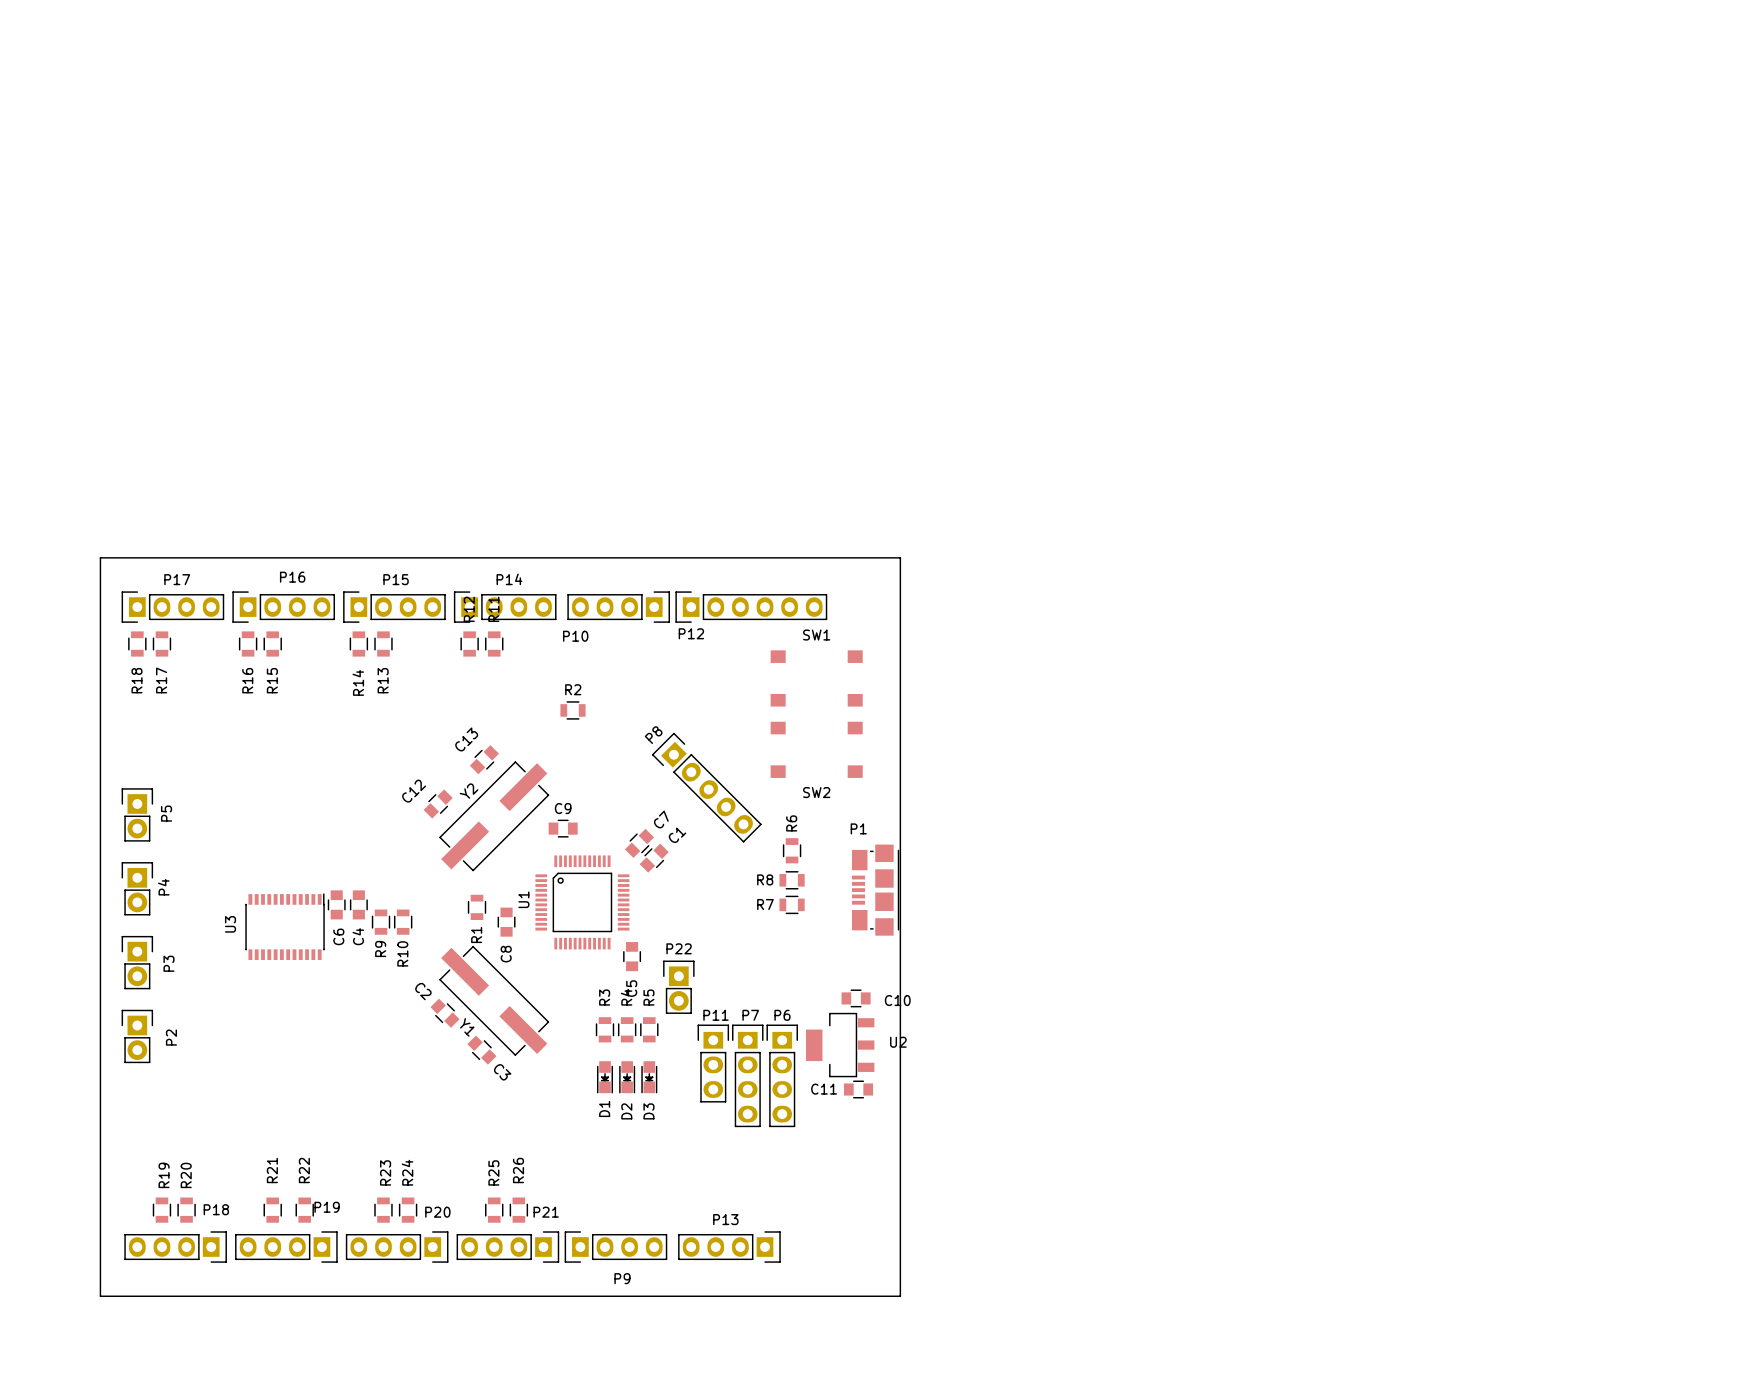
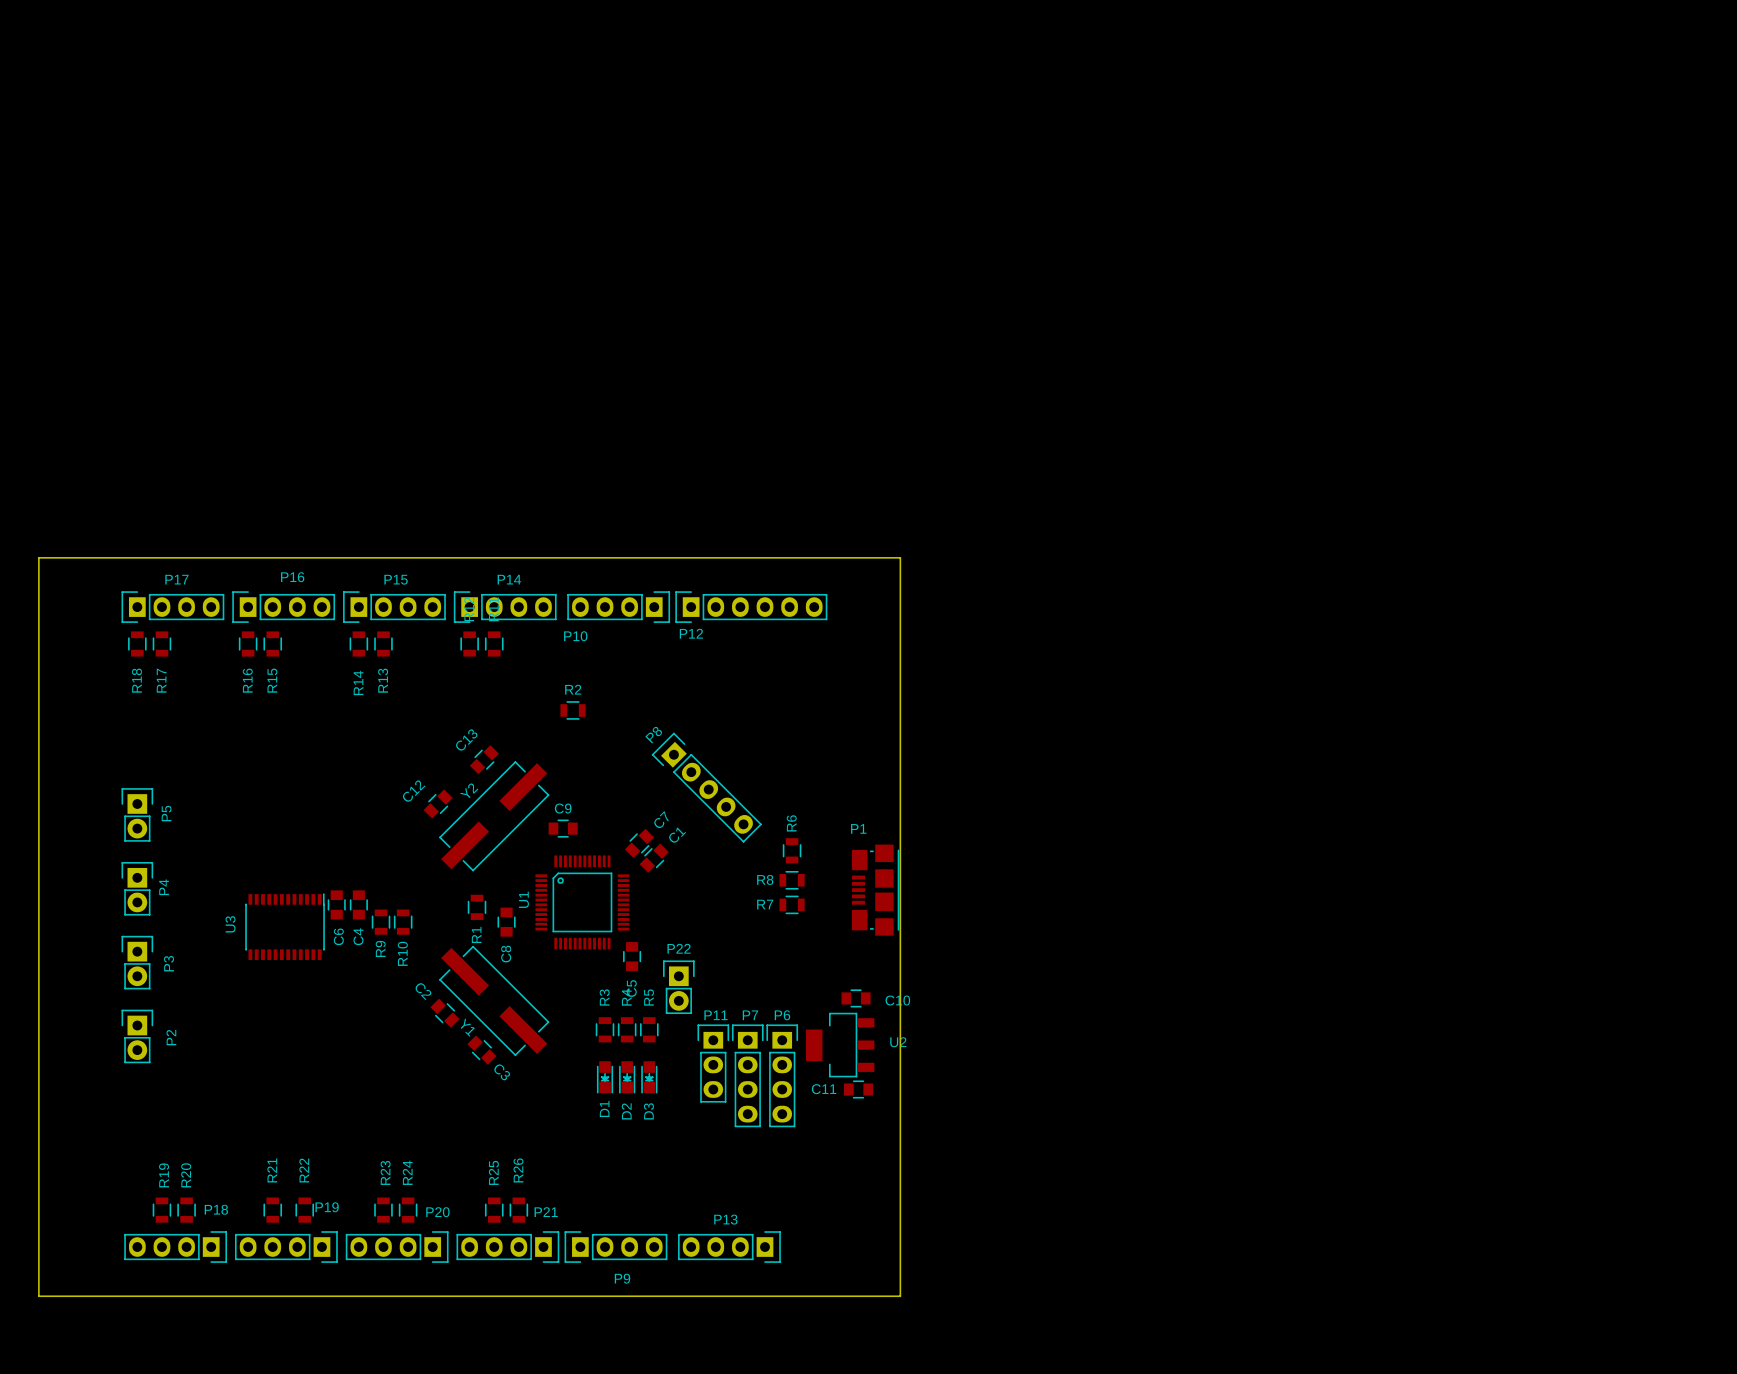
board edge: (100, 557) (100, 1296) -> (100, 557) (38, 557) (38, 1296) (100, 1296)
SW1: (816, 678) -> none
SW2: (816, 749) -> none

